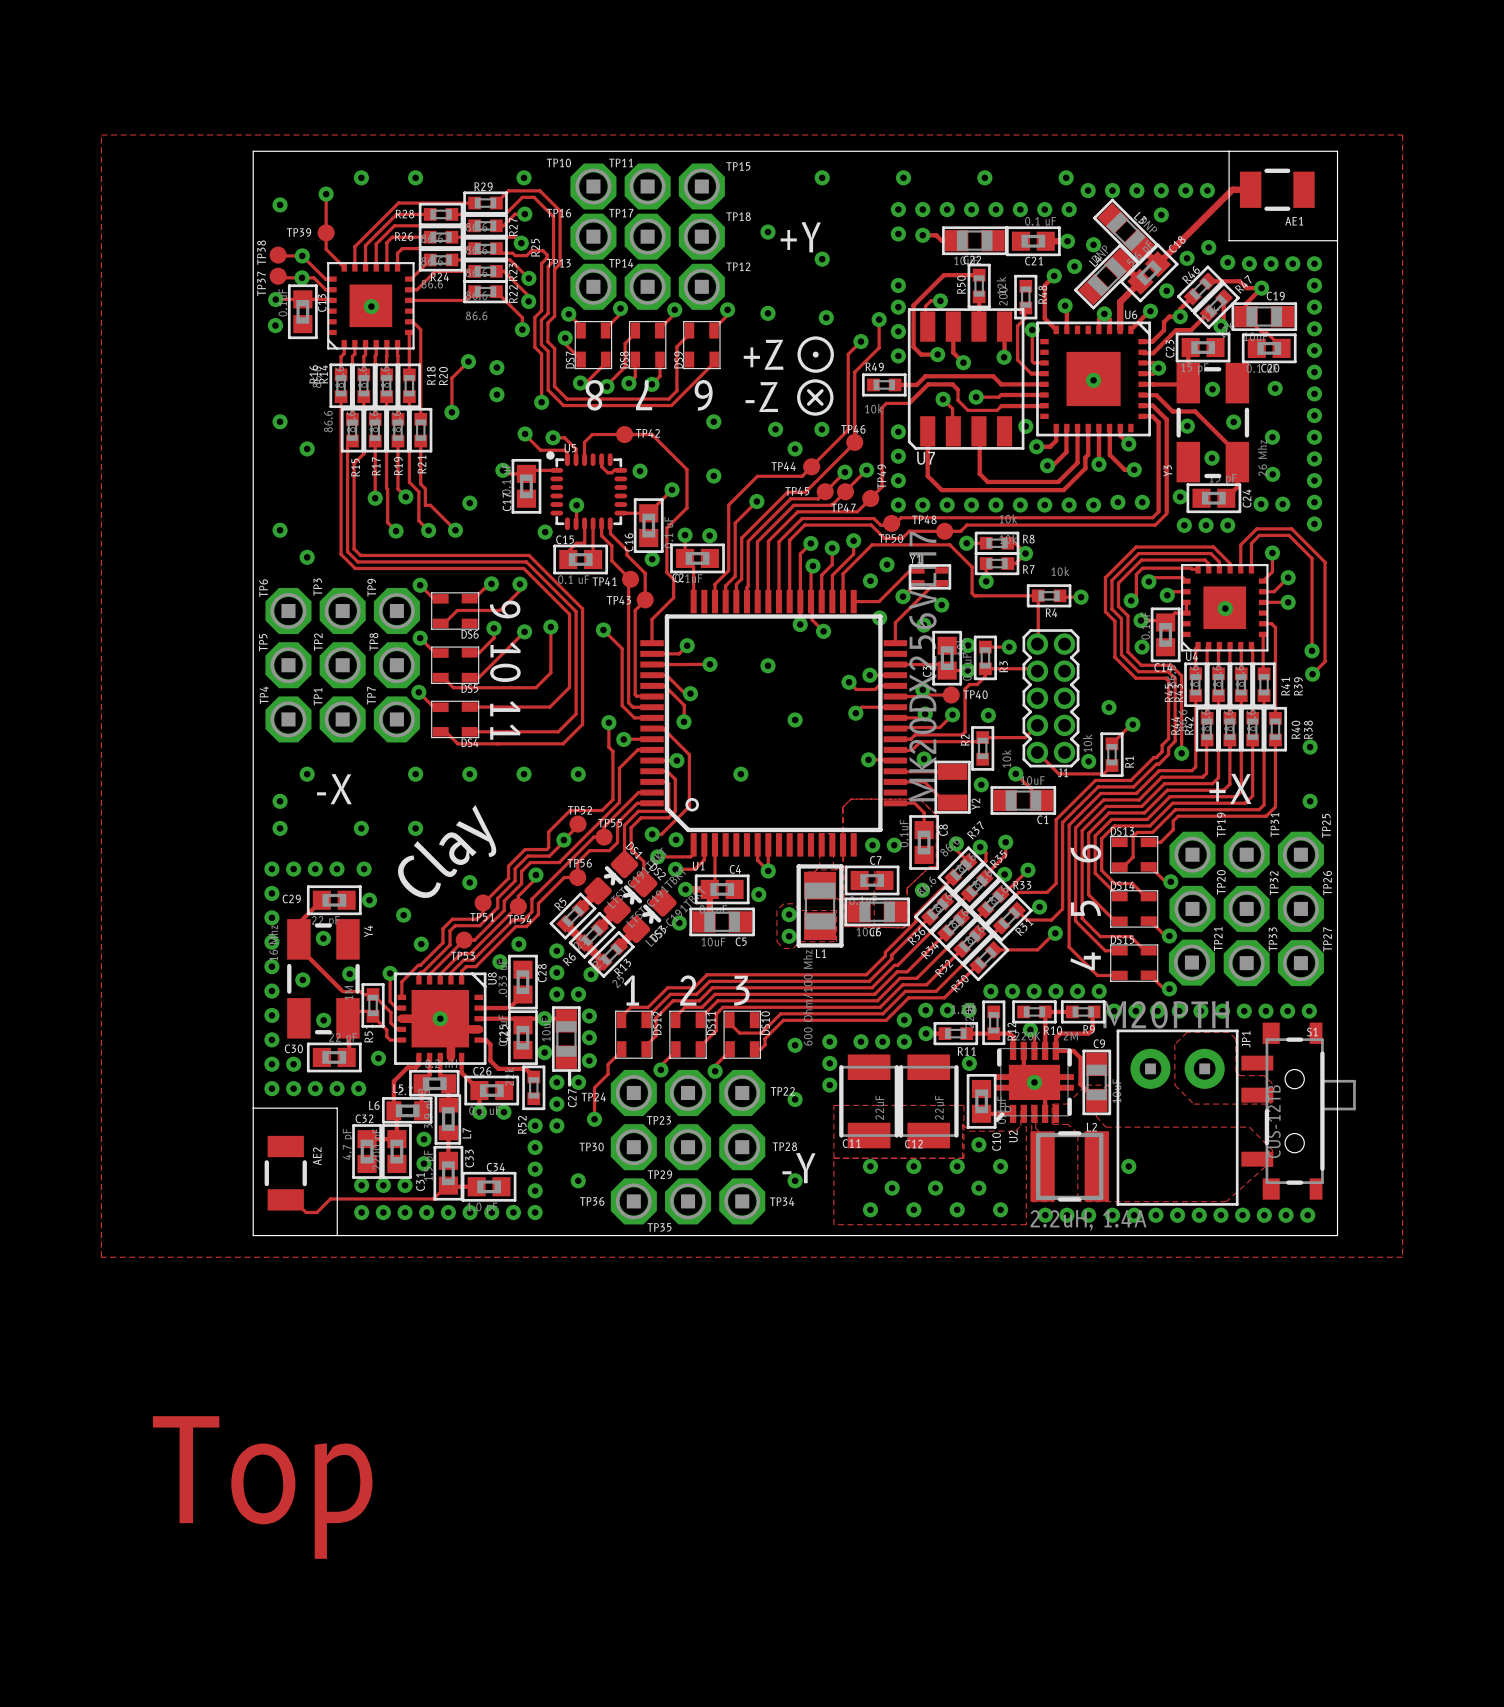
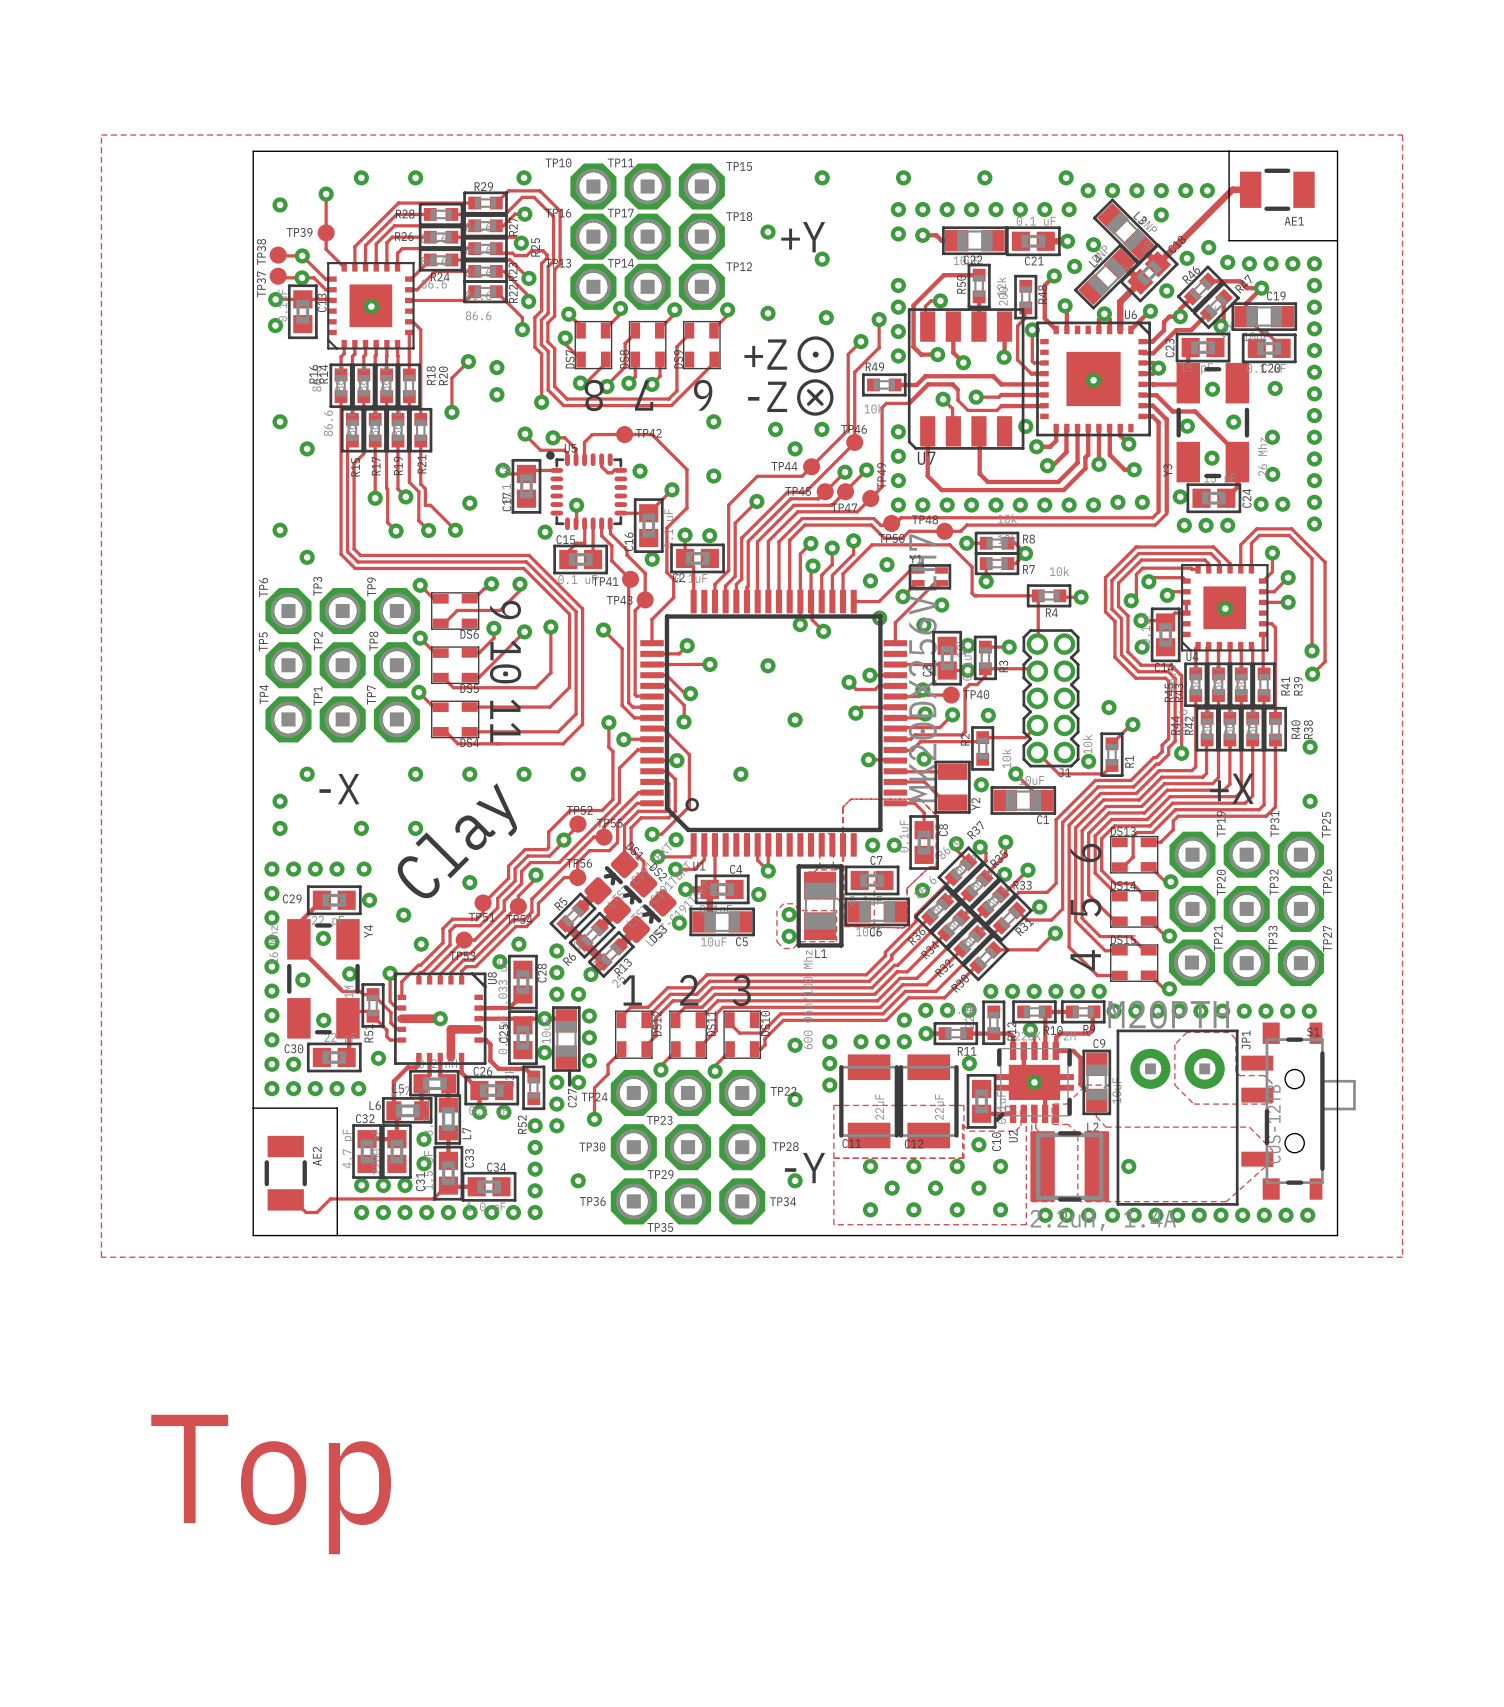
U8 footprint: [394, 972, 487, 1065] -> [394, 972, 487, 1065]

